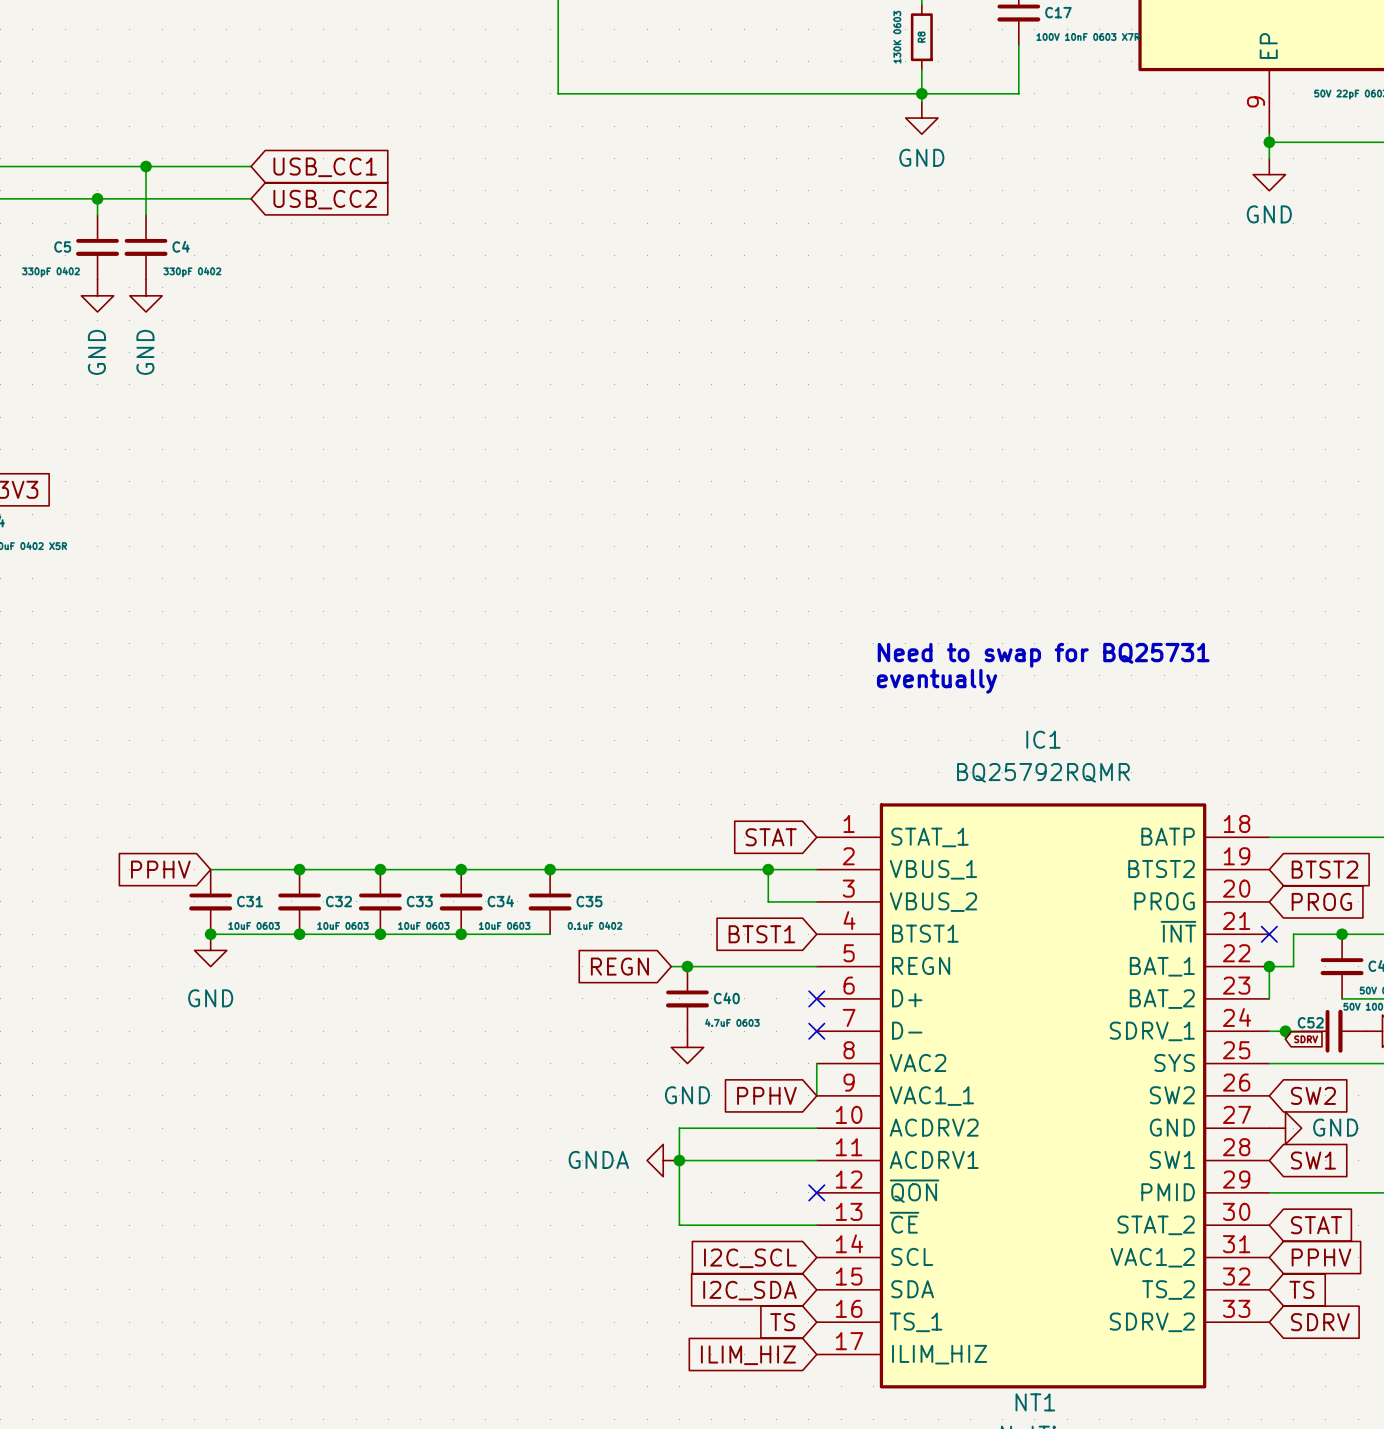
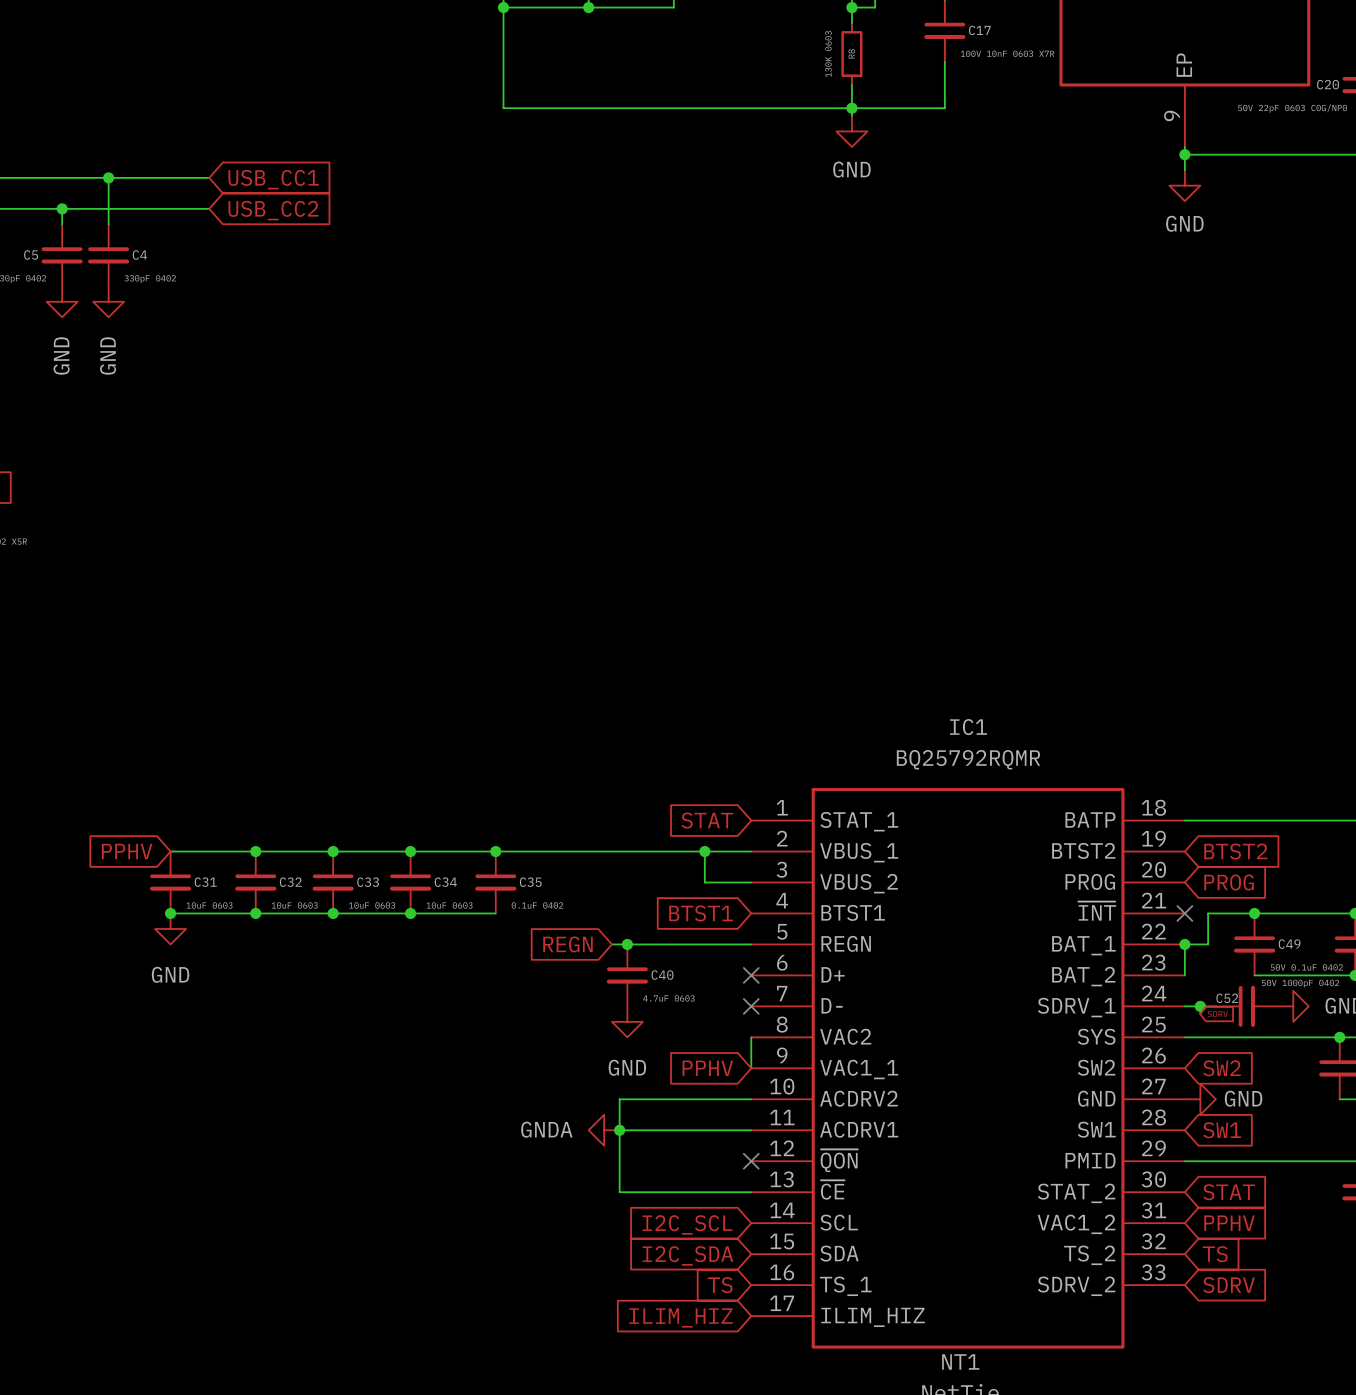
text: Need to swap for BQ25731 (1043, 655) -> none
text: eventually (937, 681) -> none

